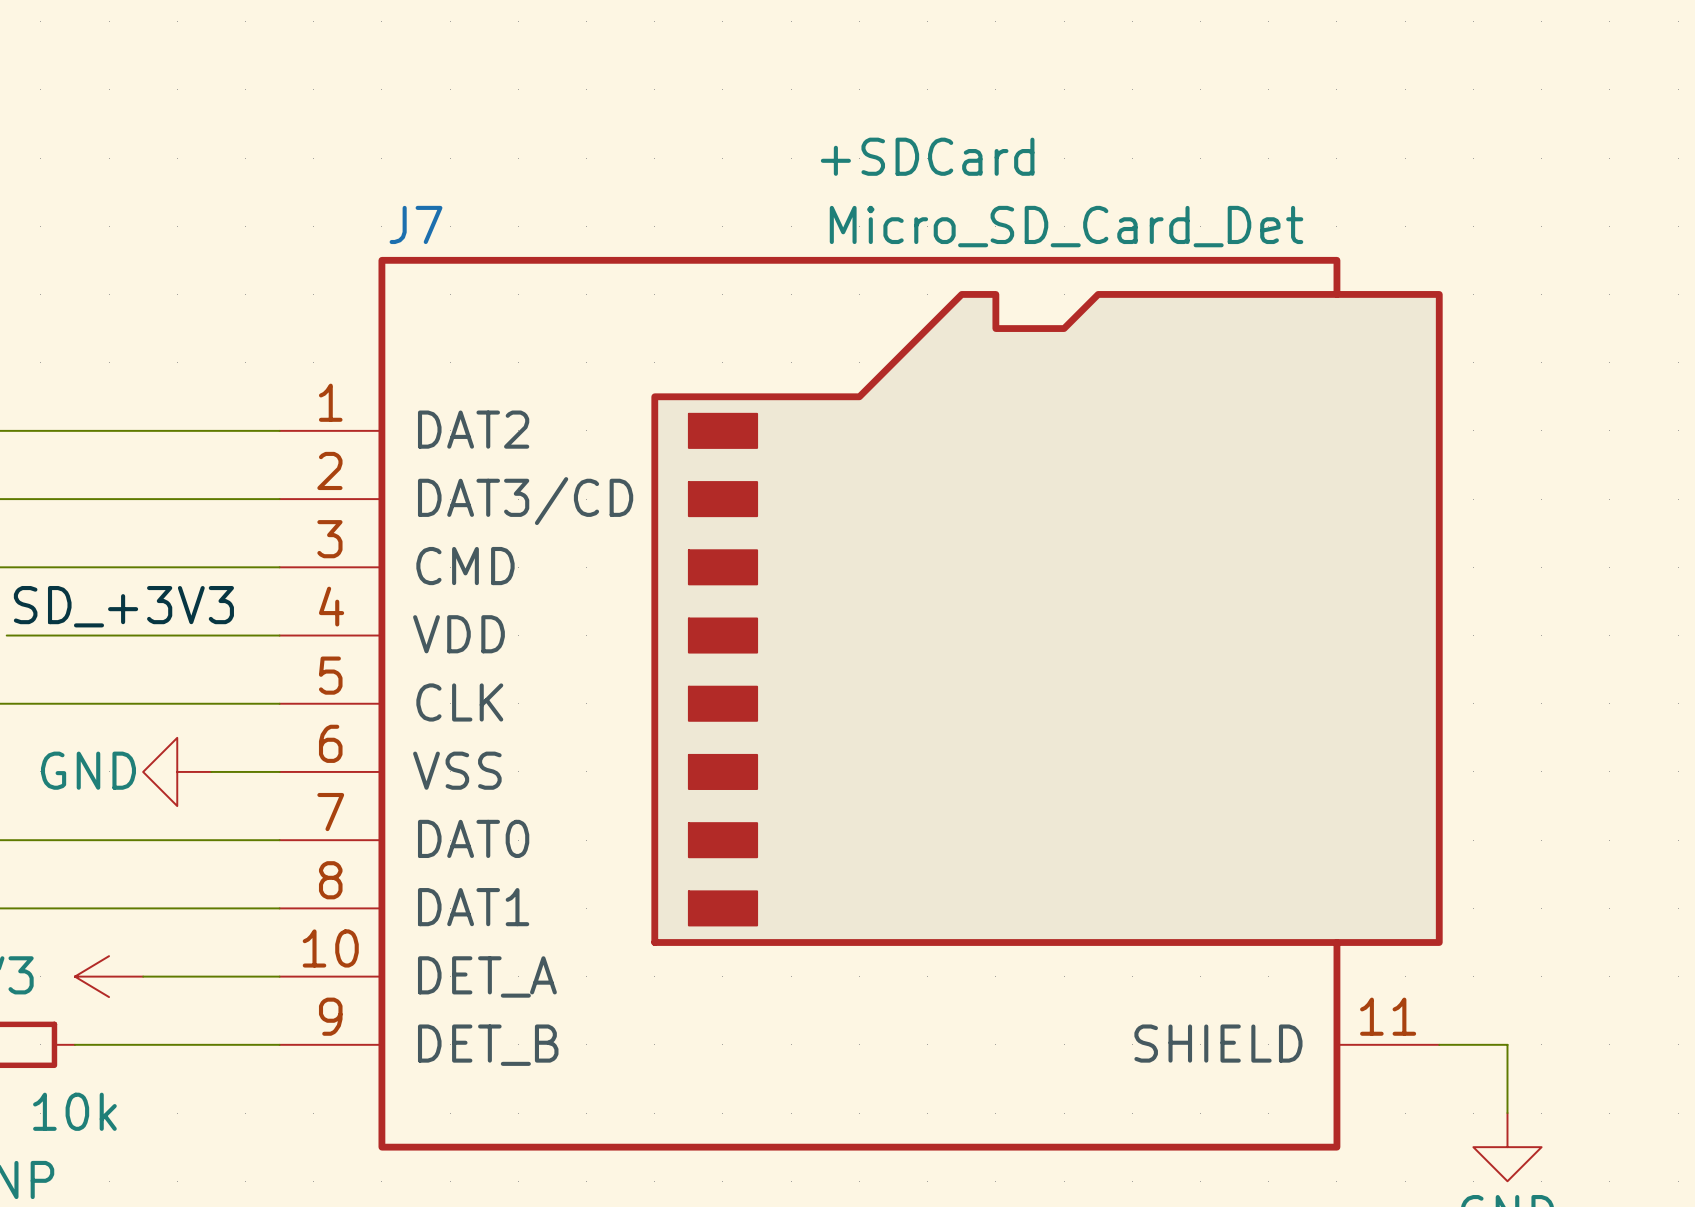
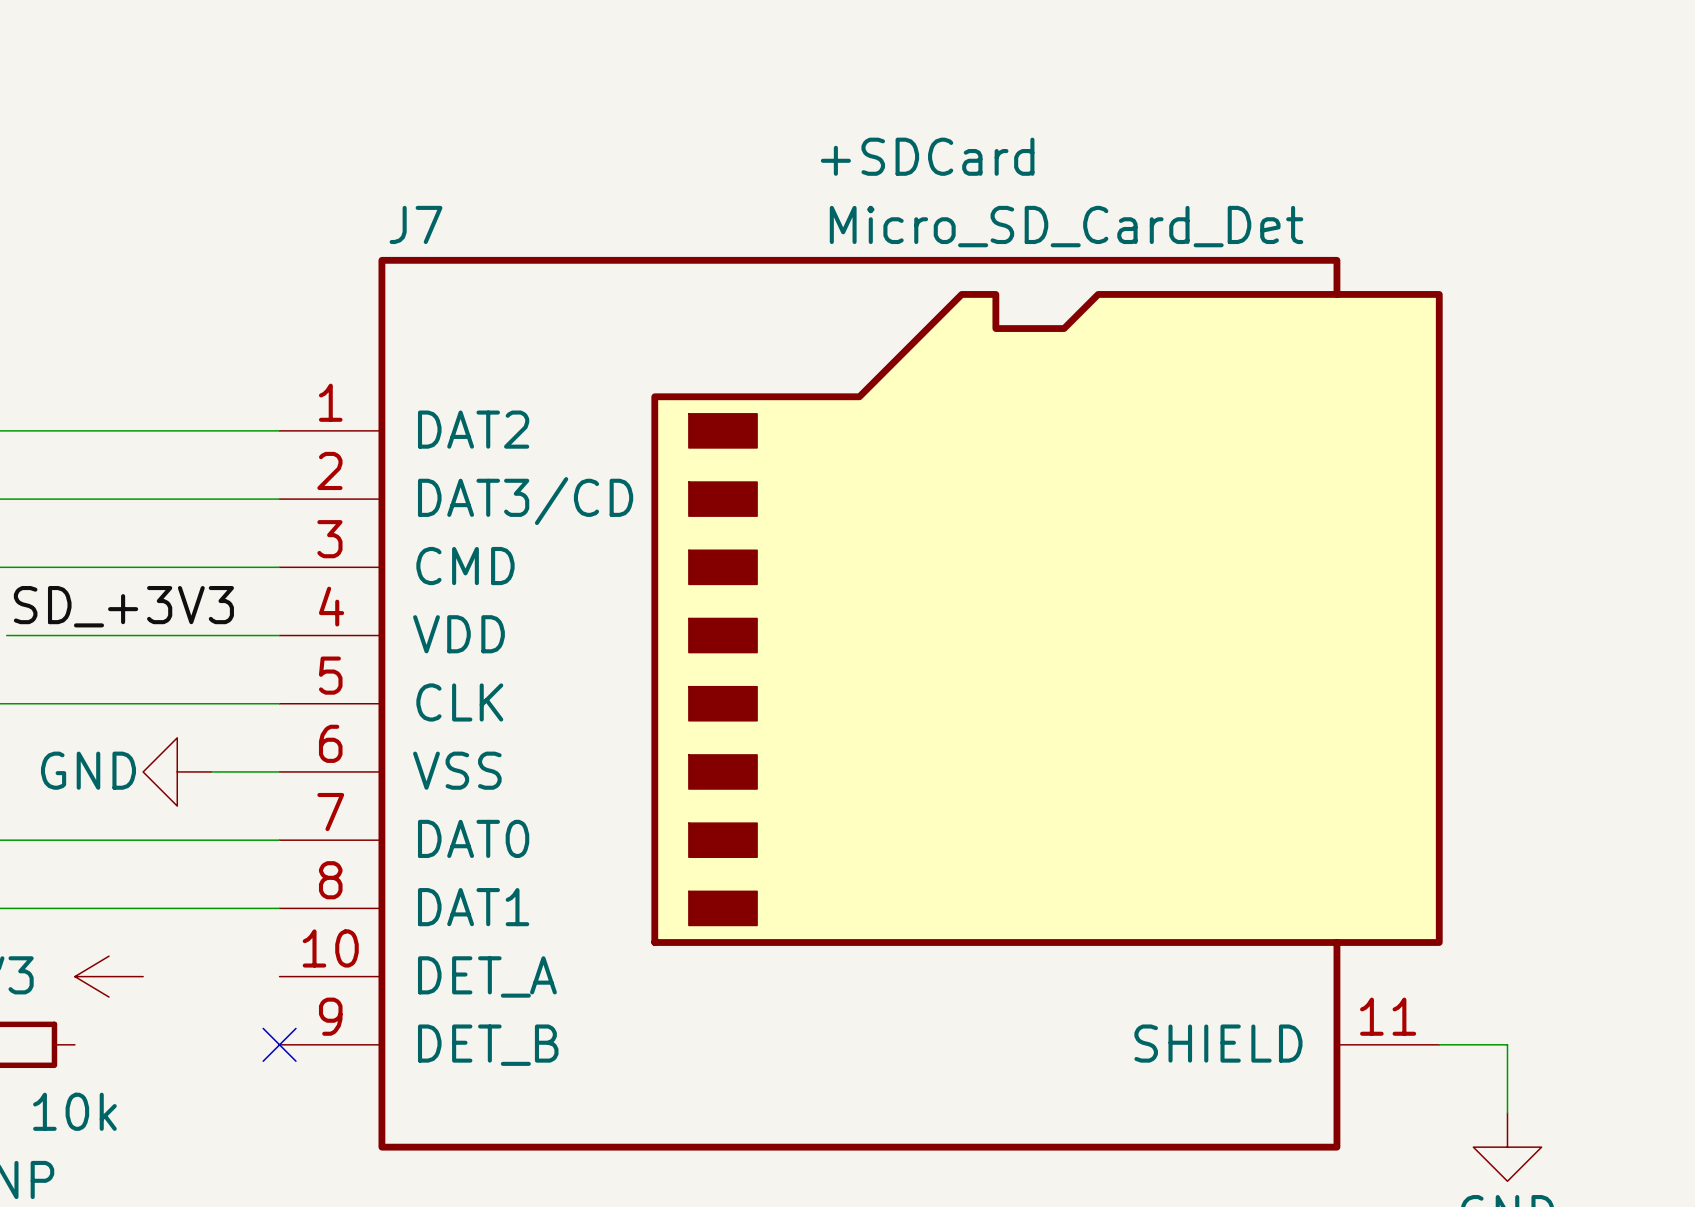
wire: (143, 976) (279, 976) -> none
wire: (74, 1044) (279, 1044) -> none
no-connect mark: none -> (279, 1044)

